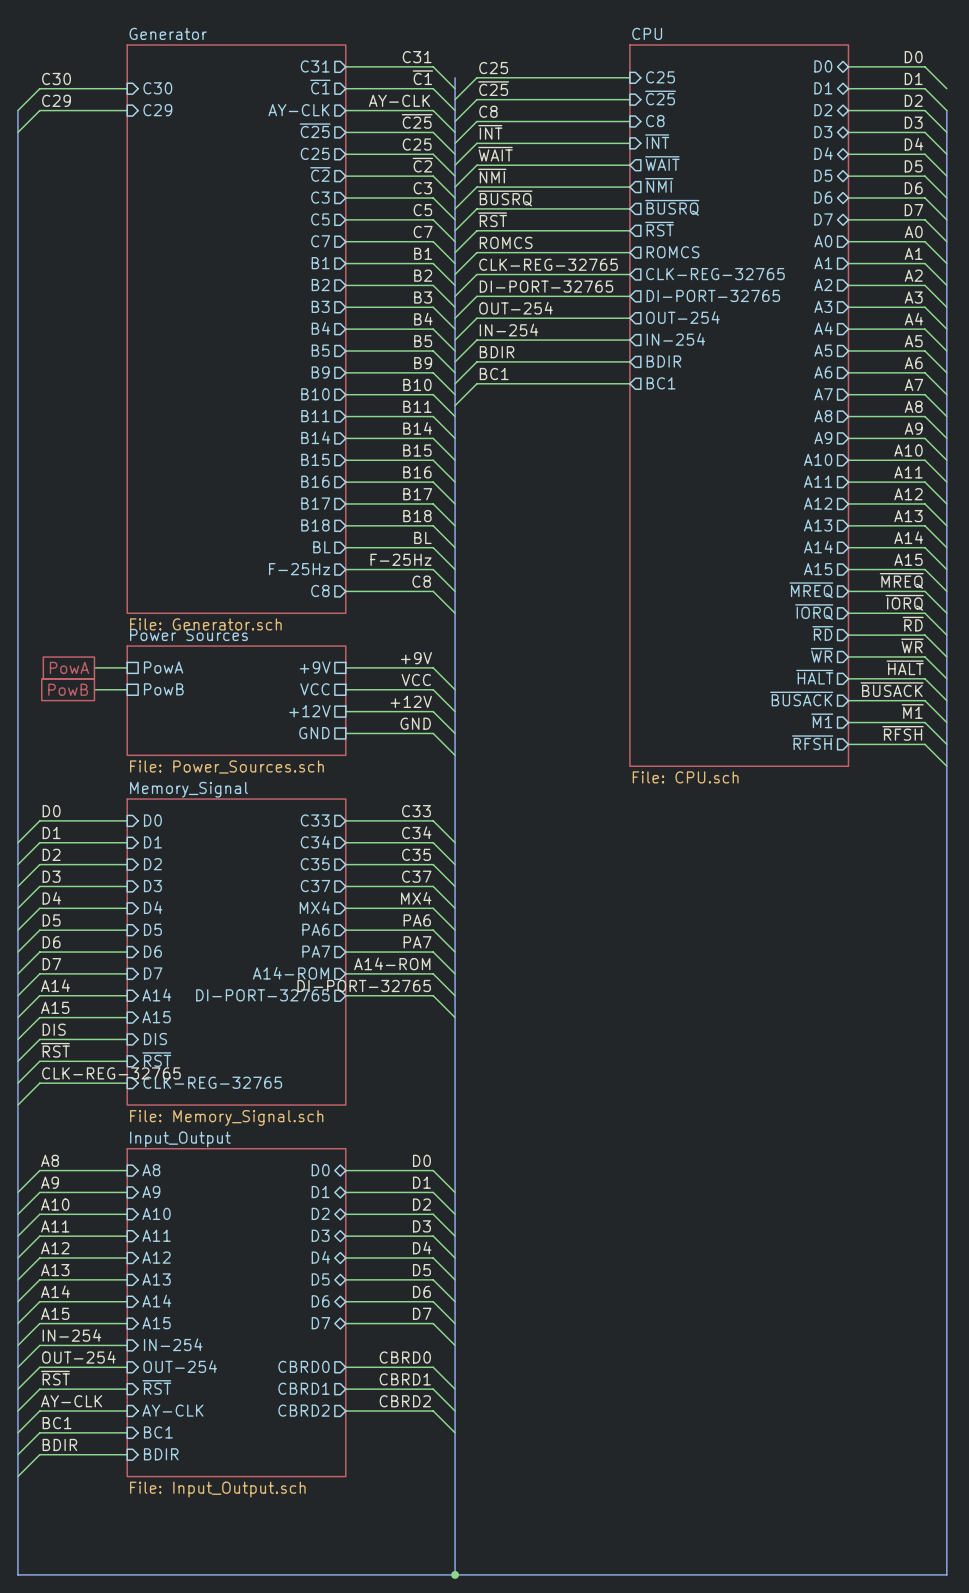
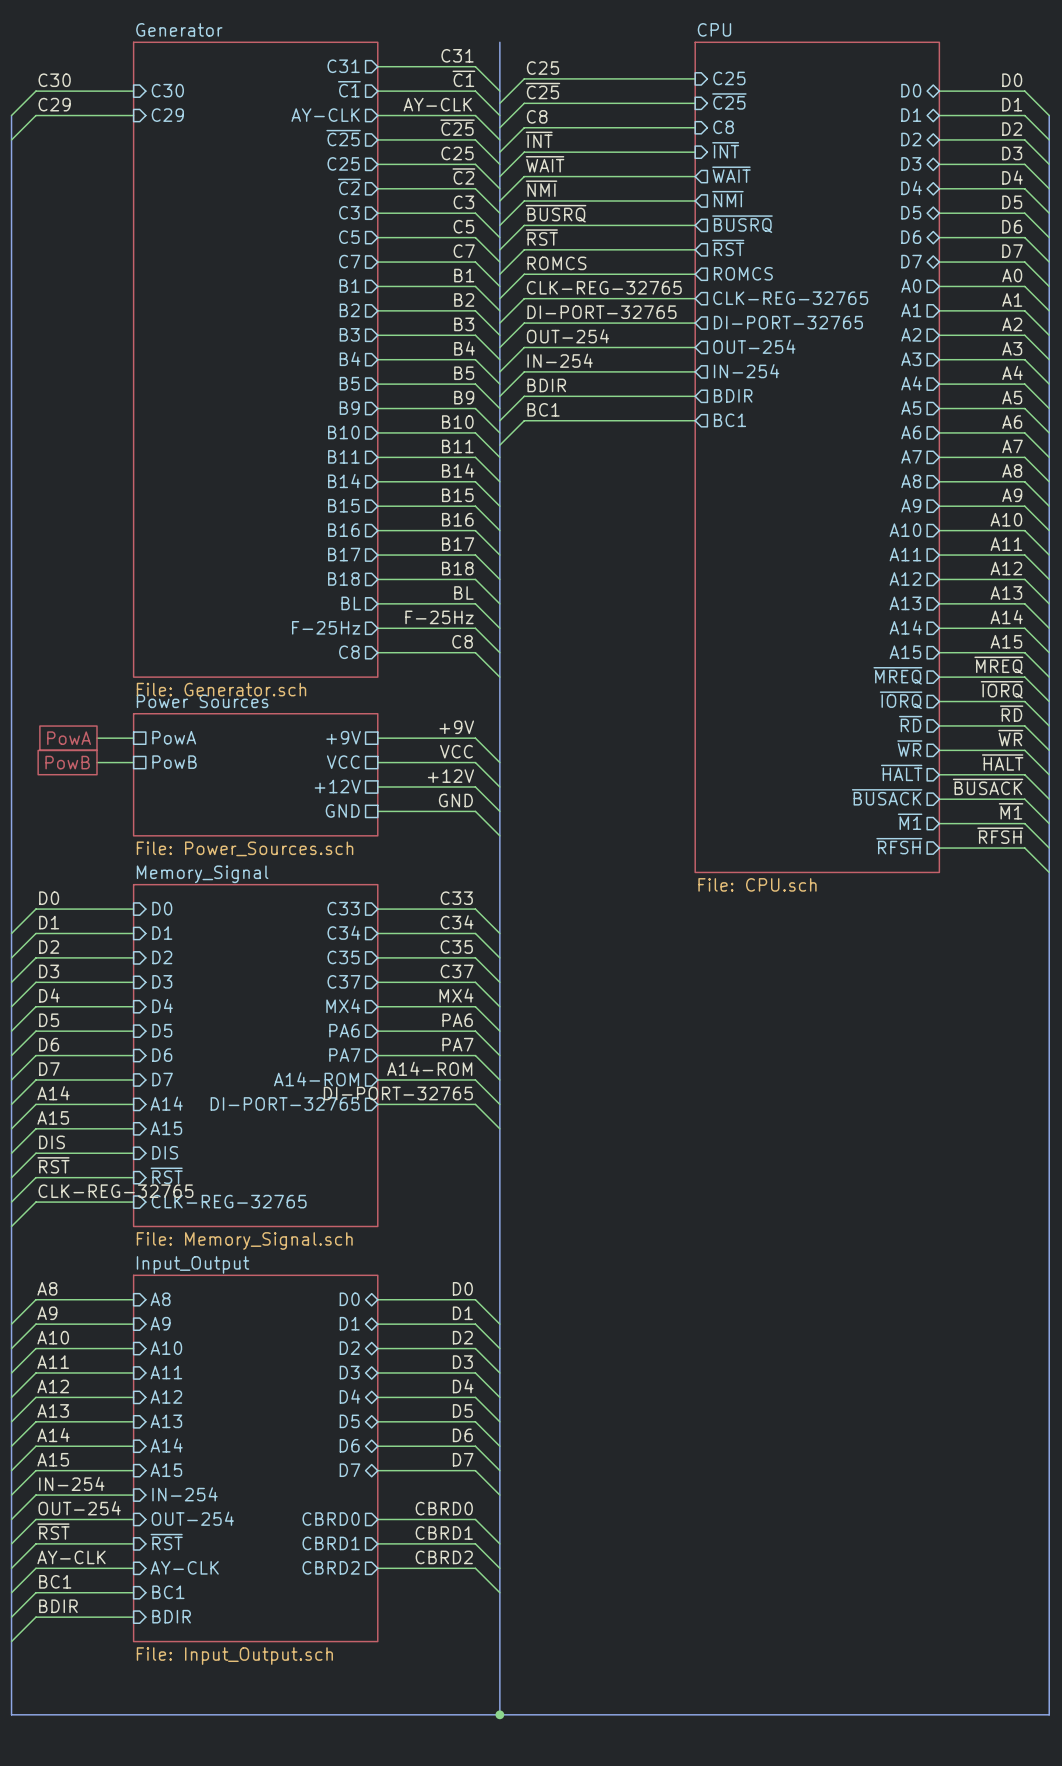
bus: none -> (499, 42) (499, 78)
label: D0 (913, 57) -> none
sheet pin: D0 (823, 66) -> none
wire: (848, 66) (924, 66) (946, 88) -> none
label: D1 (913, 78) -> D0 (1012, 80)
sheet pin: D1 (823, 88) -> D0 (911, 90)
label: D2 (913, 100) -> D1 (1012, 104)
sheet pin: D2 (823, 110) -> D1 (911, 115)
label: D3 (913, 122) -> D2 (1012, 129)
sheet pin: D3 (823, 132) -> D2 (911, 139)
label: D4 (913, 144) -> D3 (1012, 153)
sheet pin: D4 (823, 153) -> D3 (911, 163)
label: D5 (913, 166) -> D4 (1012, 177)
sheet pin: D5 (823, 175) -> D4 (911, 188)
label: D6 (913, 188) -> D5 (1012, 202)
sheet pin: D6 (823, 197) -> D5 (911, 212)
label: D7 (913, 210) -> D6 (1012, 226)
sheet pin: D7 (823, 219) -> D6 (911, 237)
label: A0 (913, 231) -> D7 (1012, 251)
sheet pin shape: output (823, 241) -> bidirectional (911, 261)
sheet pin: A0 (823, 241) -> D7 (911, 261)
label: A1 (913, 253) -> A0 (1012, 275)
sheet pin: A1 (823, 263) -> A0 (911, 286)
label: A2 (913, 275) -> A1 (1012, 299)
sheet pin: A2 (823, 285) -> A1 (911, 310)
label: A3 (913, 297) -> A2 (1012, 324)
sheet pin: A3 (823, 306) -> A2 (911, 334)
label: A4 (913, 319) -> A3 (1012, 348)
sheet pin: A4 (823, 328) -> A3 (911, 359)
label: A5 (913, 341) -> A4 (1012, 372)
sheet pin: A5 (823, 350) -> A4 (911, 383)
label: A6 (913, 363) -> A5 (1012, 397)
sheet pin: A6 (823, 372) -> A5 (911, 408)
label: A7 (913, 384) -> A6 (1012, 422)
sheet pin: A7 (823, 394) -> A6 (911, 432)
sheet CPU: File: CPU.sch (739, 405) -> none
label: A8 (913, 406) -> A7 (1012, 446)
sheet CPU: none -> File: CPU.sch (817, 457)
sheet pin: A8 (823, 416) -> A7 (911, 456)
label: A9 (913, 428) -> A8 (1012, 470)
sheet pin: A9 (823, 438) -> A8 (911, 481)
label: A10 (908, 450) -> A9 (1012, 495)
sheet pin: A10 (818, 459) -> A9 (911, 505)
label: A11 (908, 472) -> A10 (1006, 519)
sheet pin: A11 (818, 481) -> A10 (905, 530)
label: A12 (908, 494) -> A11 (1006, 544)
sheet pin: A12 (818, 503) -> A11 (905, 554)
label: A13 (908, 516) -> A12 (1006, 568)
sheet pin: A13 (818, 525) -> A12 (905, 579)
label: A14 (908, 537) -> A13 (1006, 592)
sheet pin: A14 (818, 547) -> A13 (905, 603)
label: A15 (908, 559) -> A14 (1006, 617)
sheet pin: A15 (818, 569) -> A14 (905, 627)
label: ~{MREQ} (901, 580) -> A15 (1006, 641)
sheet pin: ~{MREQ} (811, 590) -> A15 (905, 652)
label: ~{IORQ} (904, 602) -> ~{MREQ} (998, 665)
sheet pin: ~{IORQ} (814, 612) -> ~{MREQ} (897, 675)
label: ~{RD} (913, 624) -> ~{IORQ} (1002, 689)
sheet pin: ~{RD} (822, 633) -> ~{IORQ} (901, 700)
label: ~{WR} (912, 645) -> ~{RD} (1011, 713)
sheet pin: ~{WR} (822, 655) -> ~{RD} (910, 724)
label: ~{HALT} (905, 667) -> ~{WR} (1010, 738)
sheet pin: ~{HALT} (814, 677) -> ~{WR} (909, 748)
label: ~{BUSACK} (892, 689) -> ~{HALT} (1002, 762)
sheet pin: ~{BUSACK} (801, 699) -> ~{HALT} (901, 772)
label: ~{M1} (912, 711) -> ~{BUSACK} (988, 786)
sheet pin: ~{M1} (822, 720) -> ~{BUSACK} (887, 797)
label: ~{RFSH} (903, 733) -> ~{M1} (1011, 811)
sheet pin: ~{RFSH} (812, 742) -> ~{M1} (910, 821)
label: none -> ~{RFSH} (1000, 835)
sheet pin: none -> ~{RFSH} (899, 846)
wire: none -> (939, 848) (1024, 848) (1049, 872)
bus: (17, 1542) (17, 1574) (946, 1574) (946, 1542) -> (11, 1714) (1049, 1714)
bus: (455, 1542) (455, 1574) -> none
junction position: (455, 1574) -> (499, 1714)

